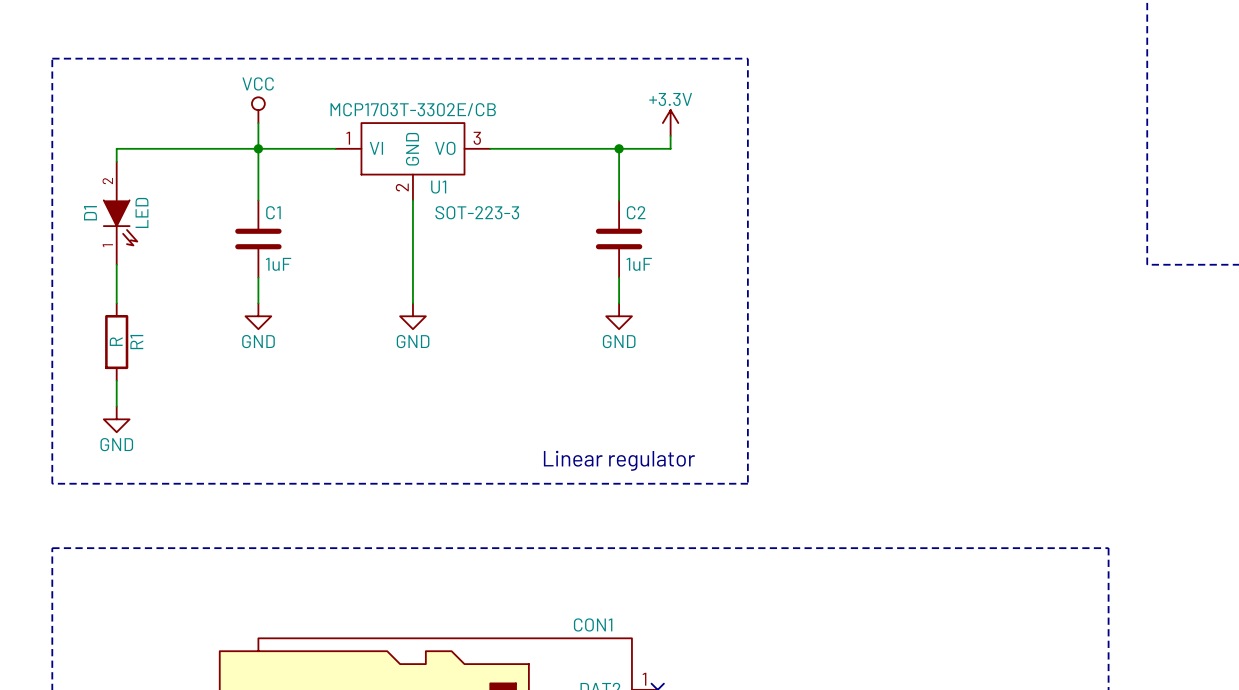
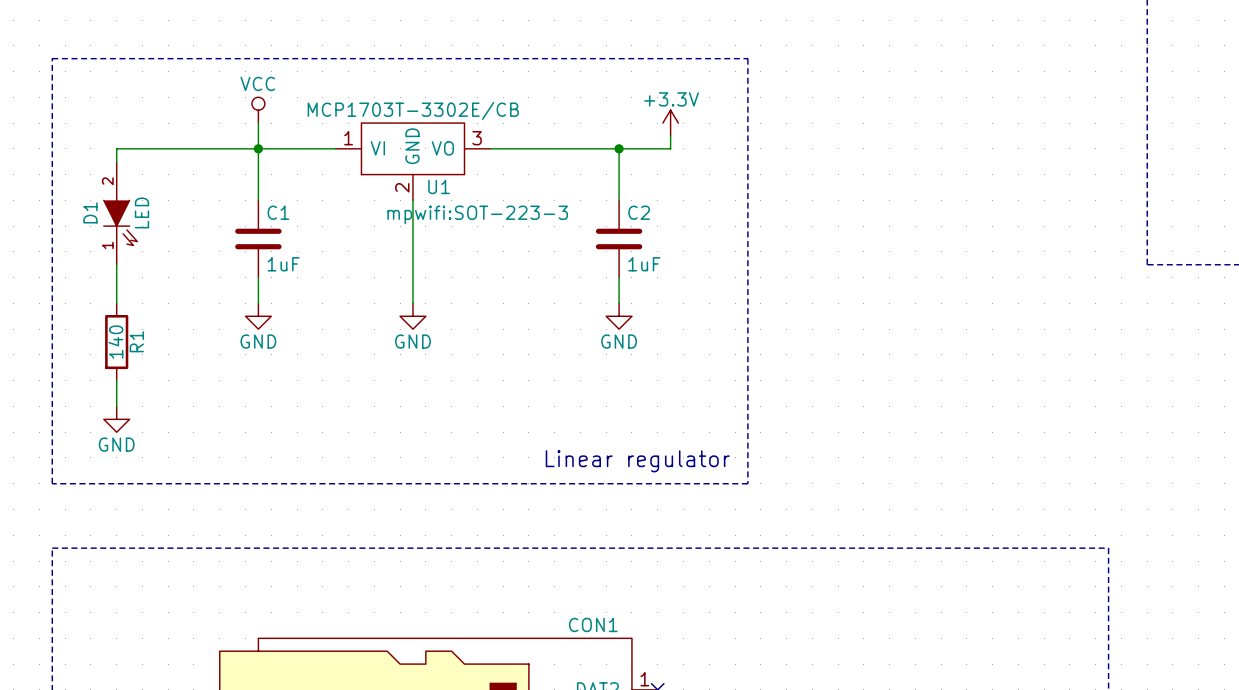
U1 text: SOT-223-3 (477, 212) -> mpwifi:SOT-223-3 (477, 214)
R1 value: R (116, 341) -> 140 (115, 342)

